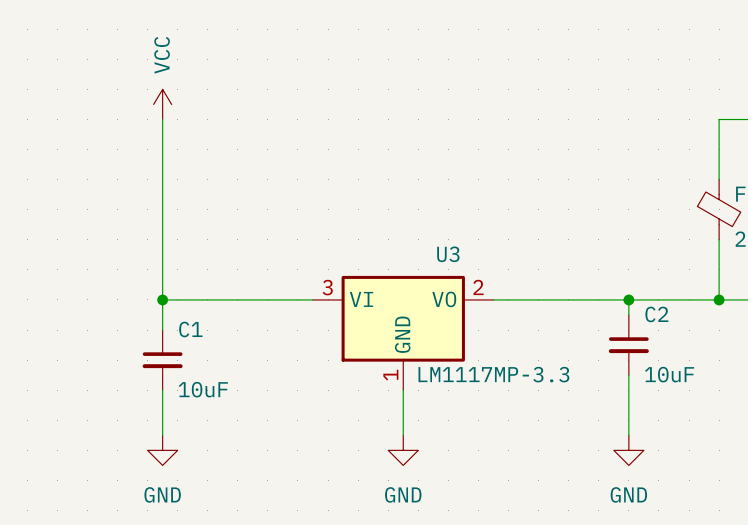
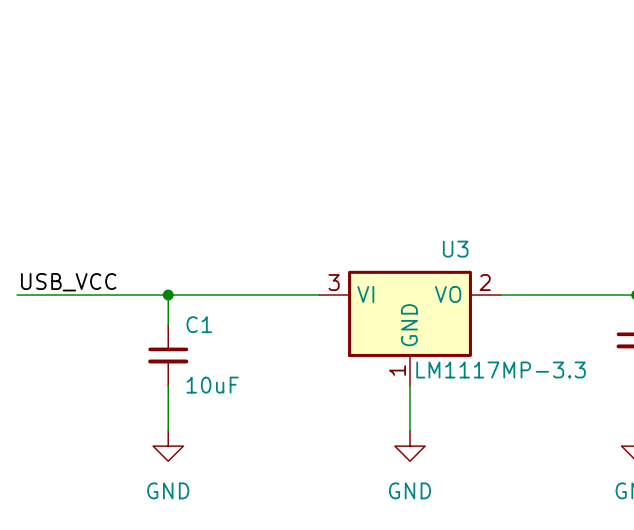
power symbol: VCC (162, 104) -> none
wire: (162, 119) (162, 299) -> (17, 295) (168, 295)
label: none -> USB_VCC (68, 282)

